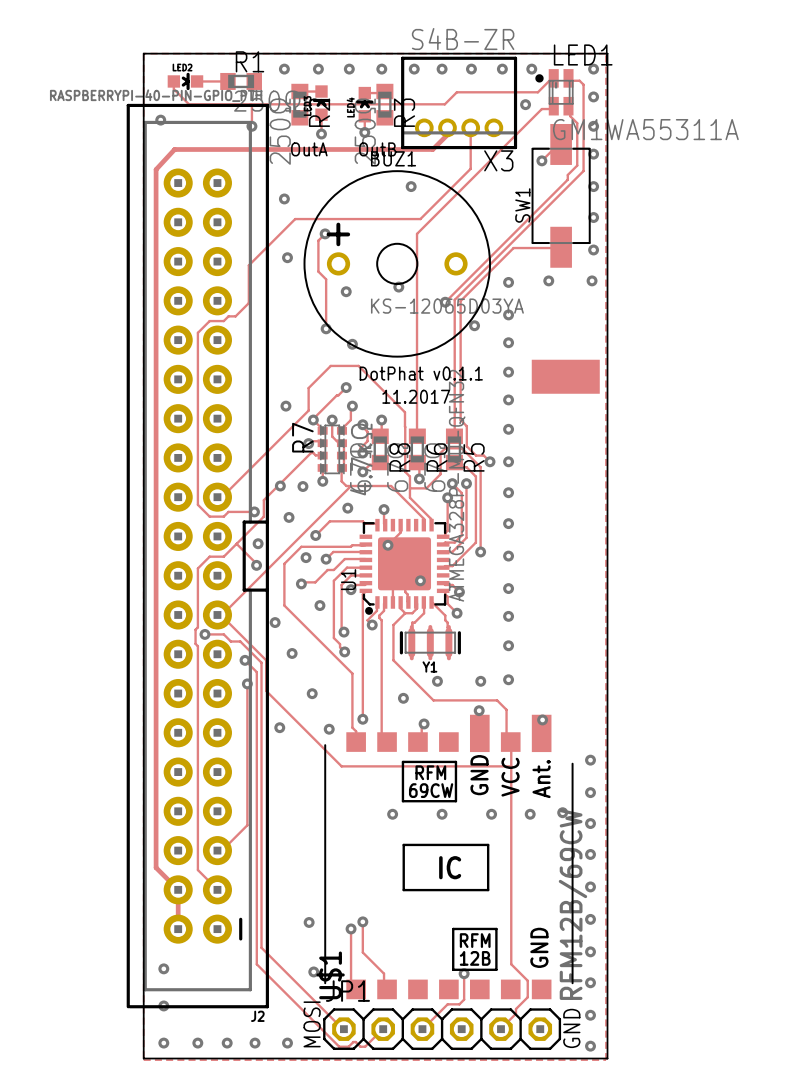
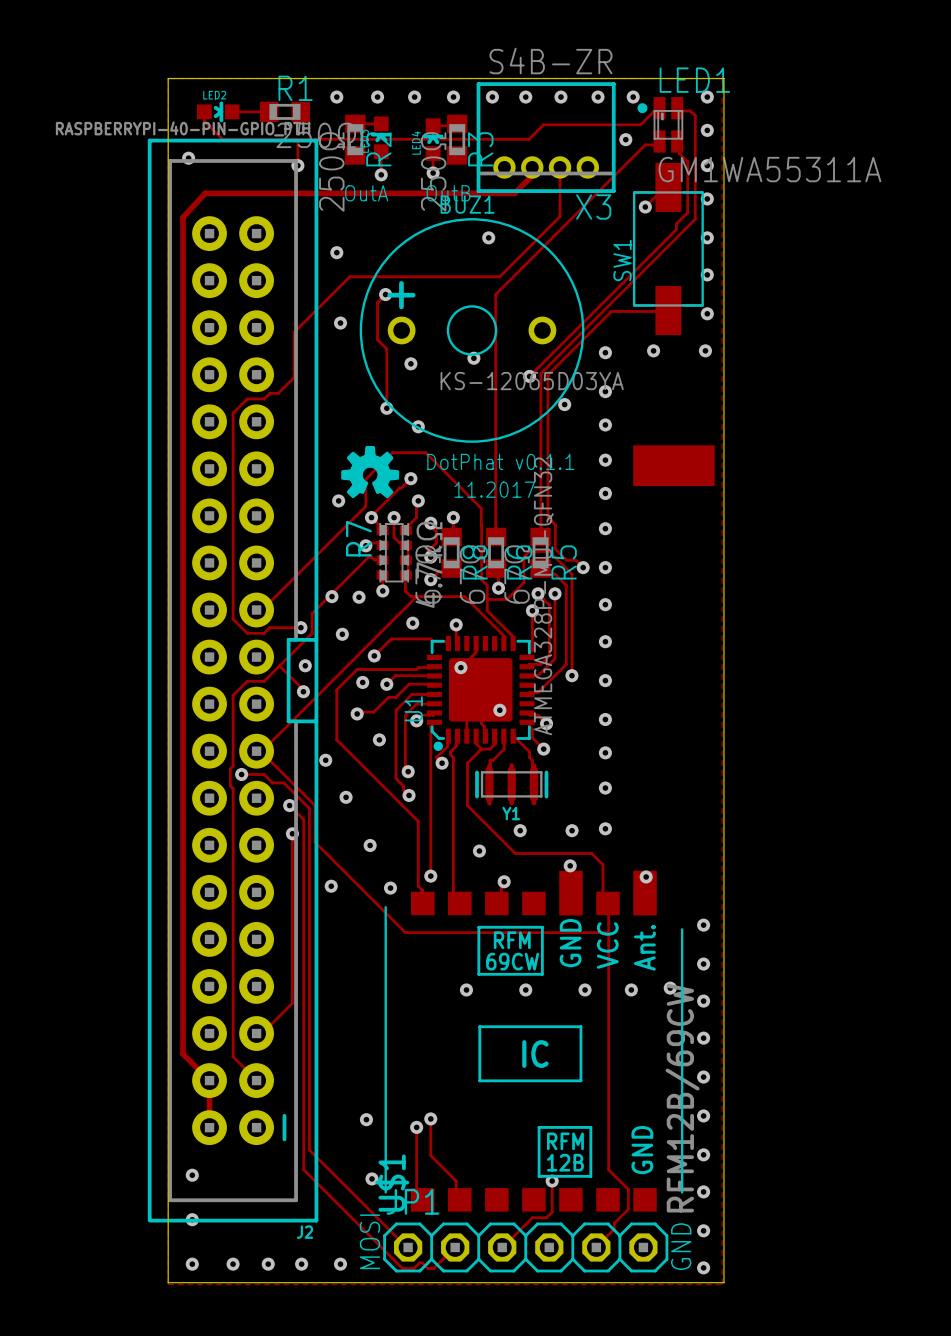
drawing: none -> [341, 446, 400, 499]

